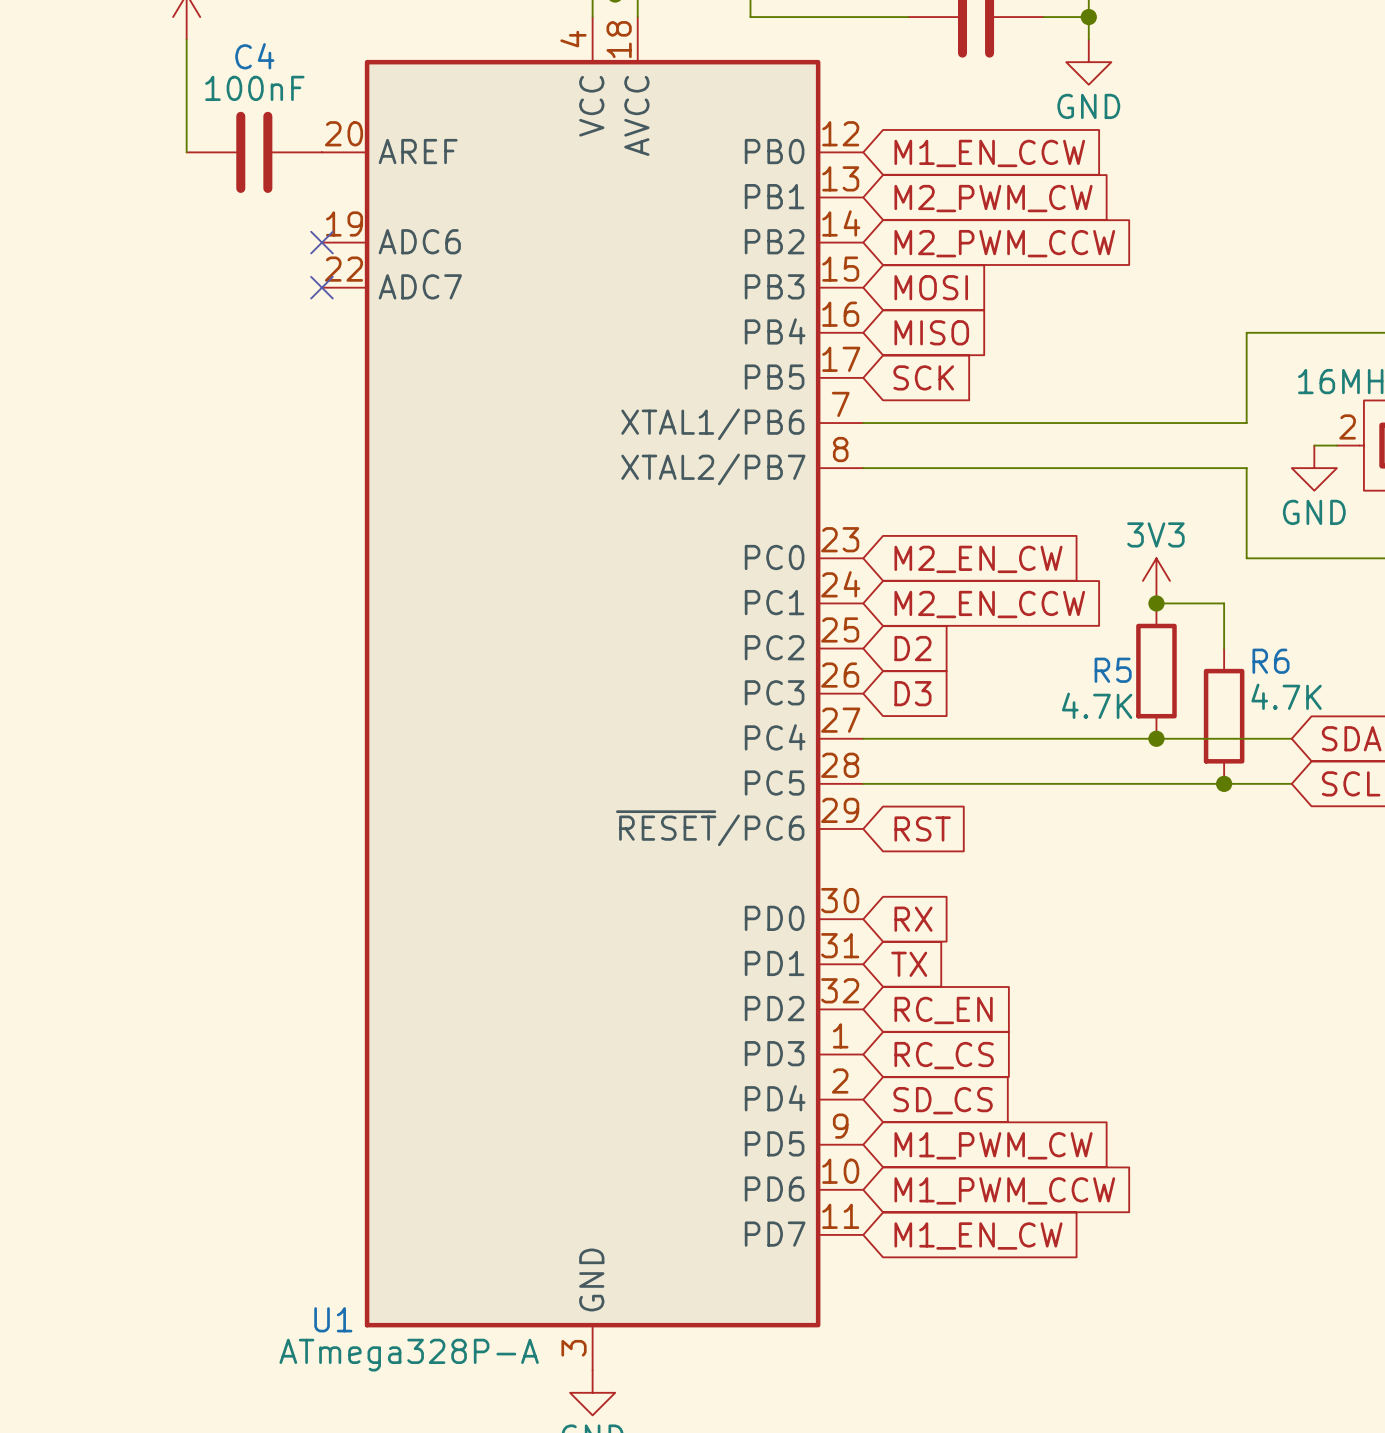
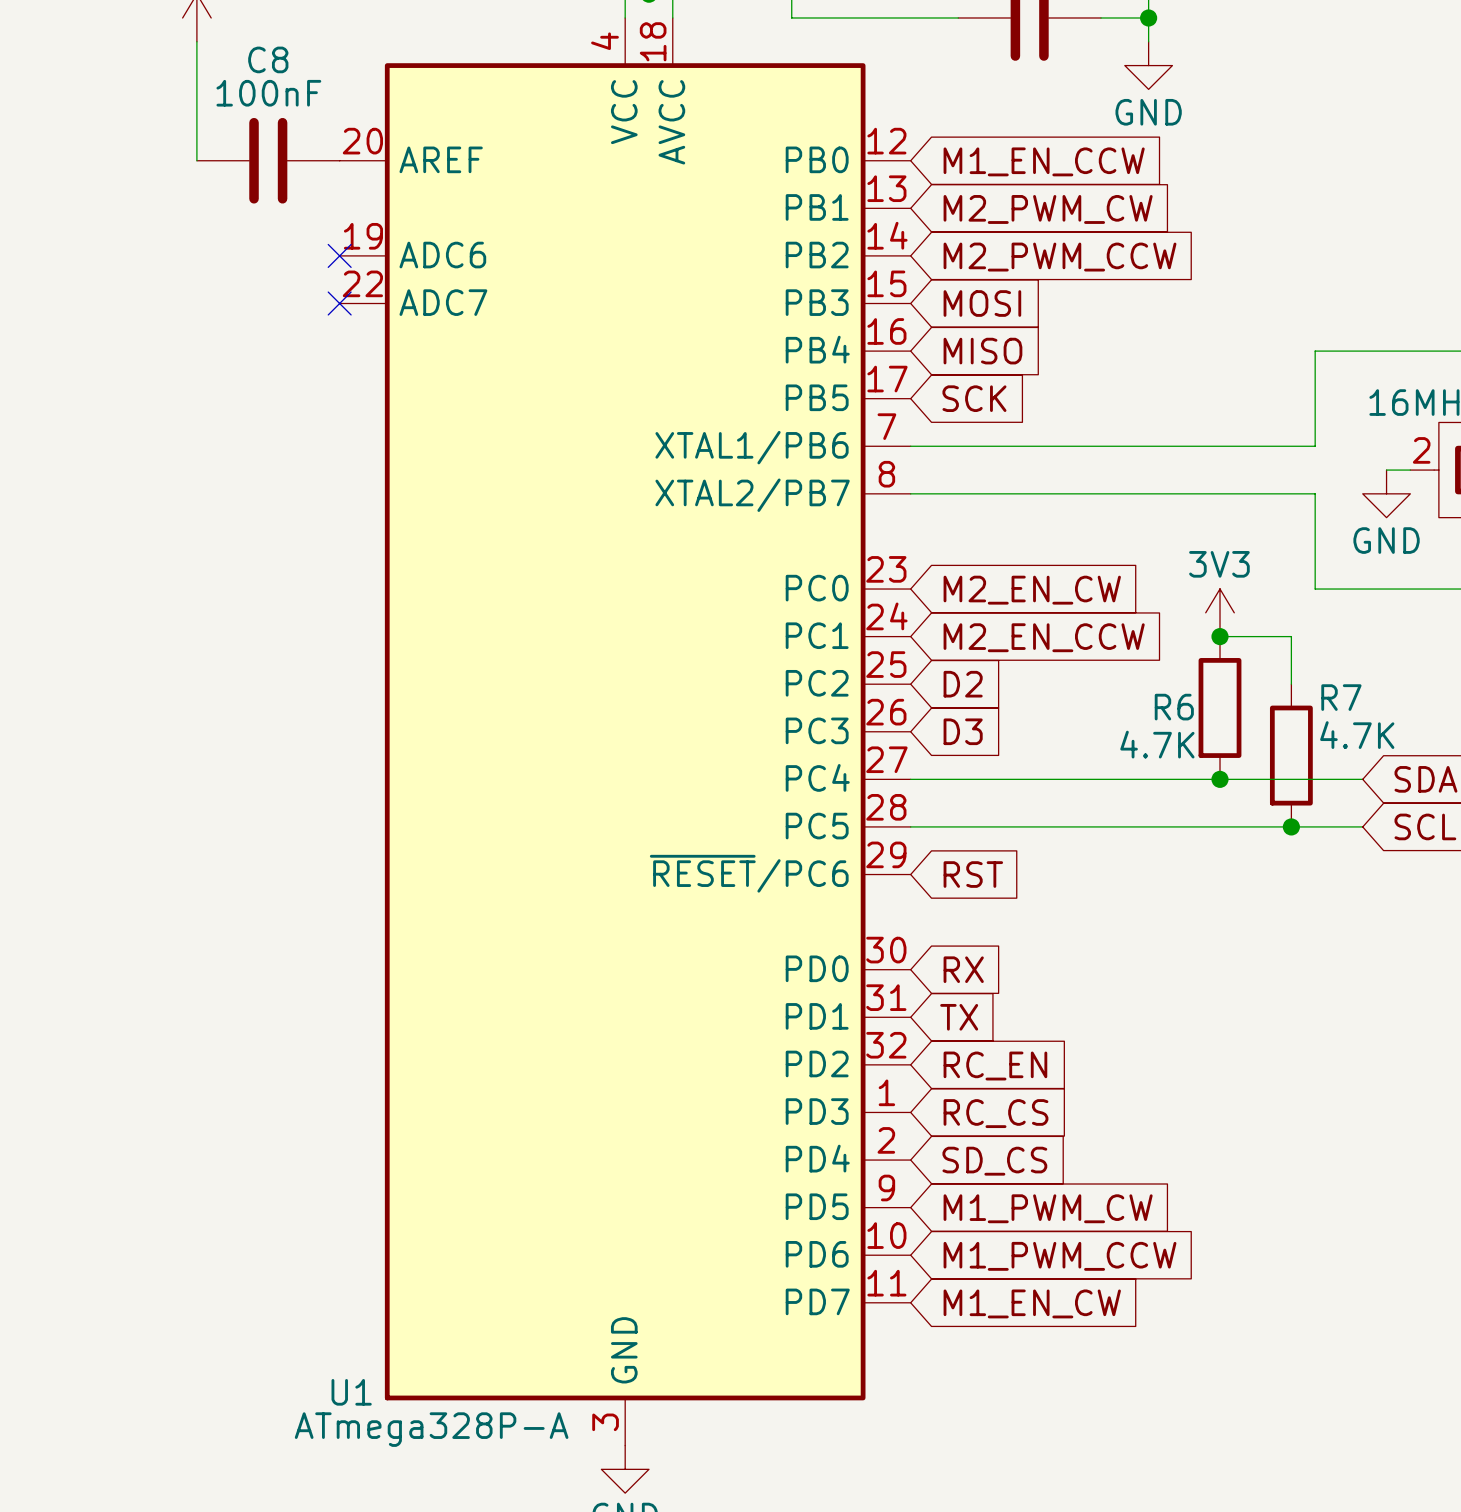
C4 name: C4 (254, 56) -> C8 (268, 59)
R6 name: R6 (1271, 661) -> R7 (1341, 697)
R5 name: R5 (1113, 670) -> R6 (1174, 707)

